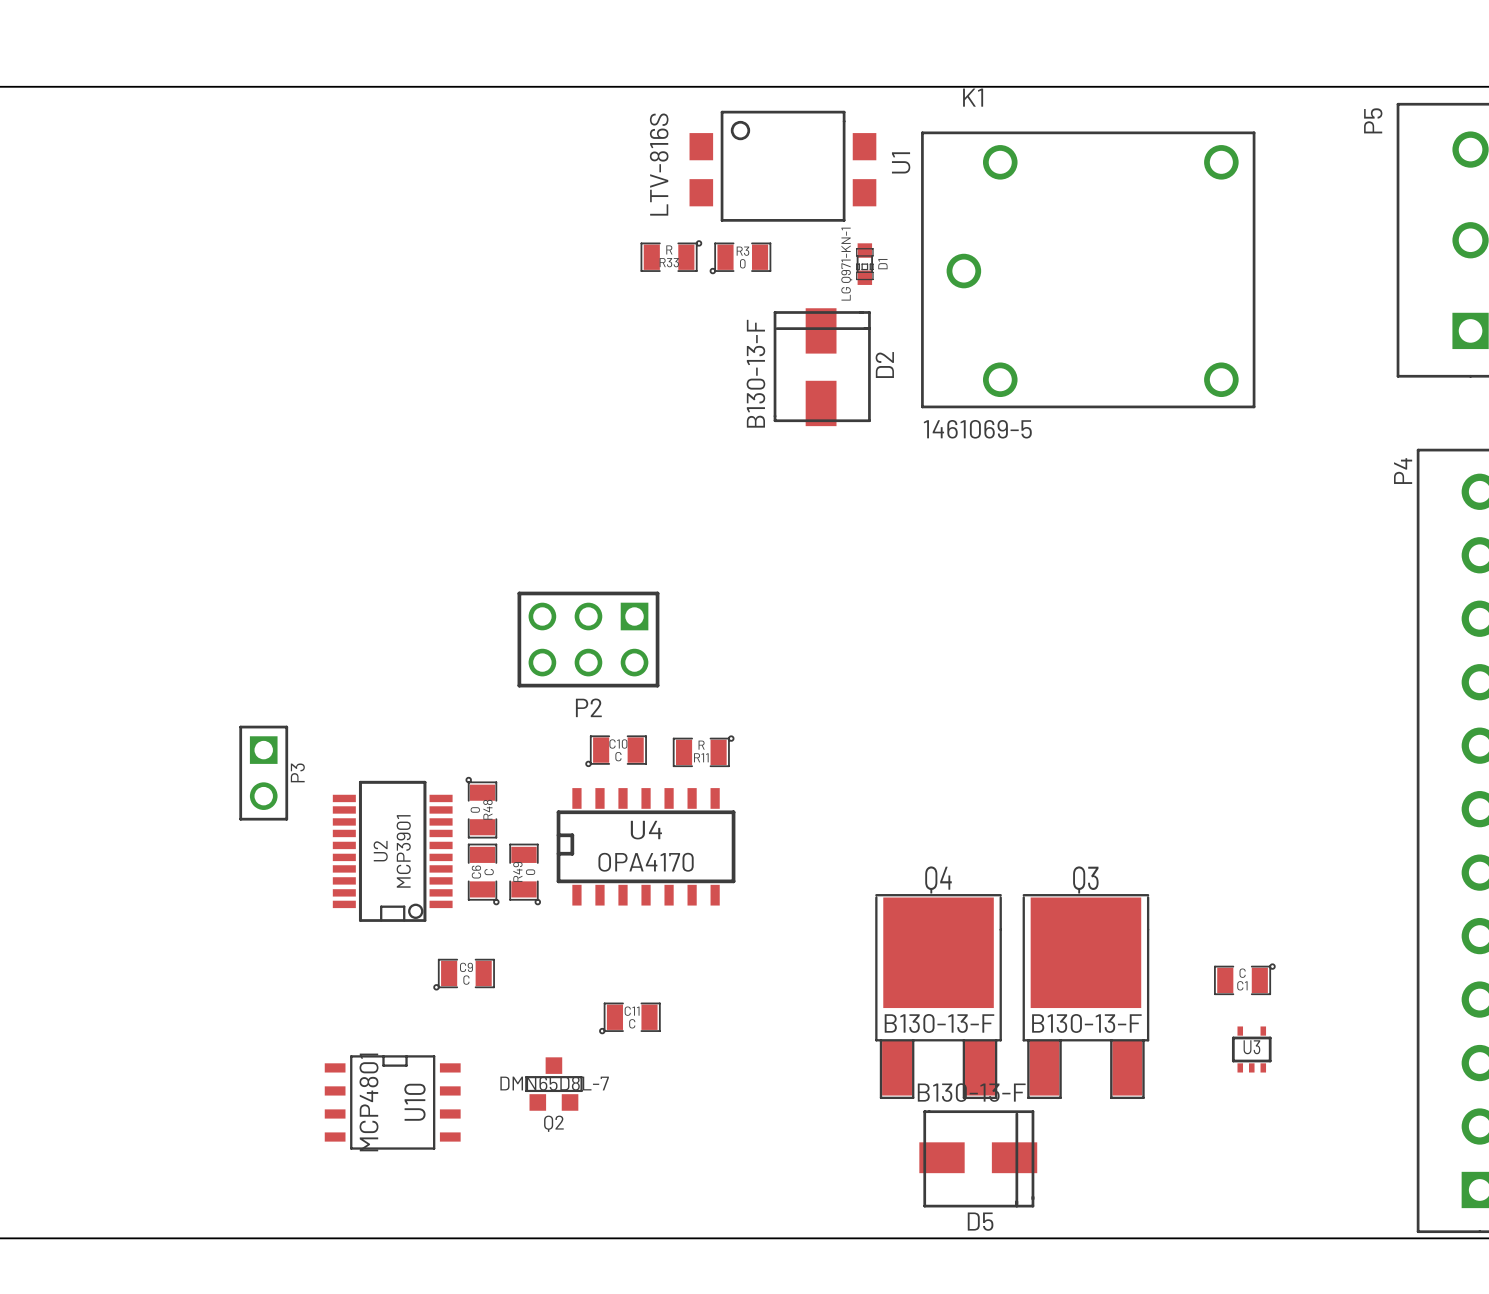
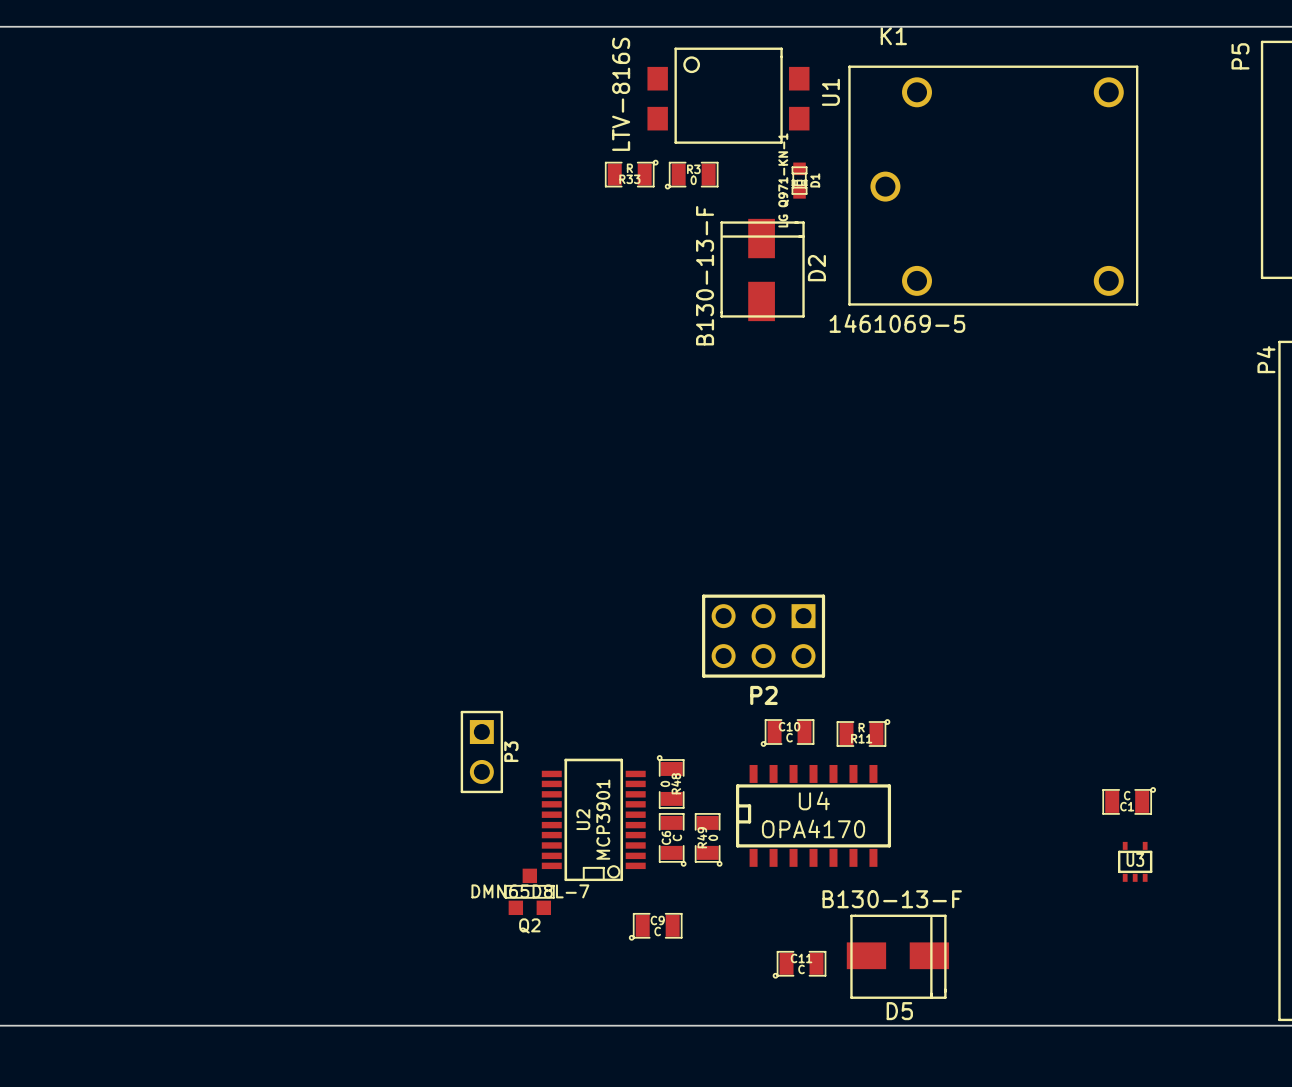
P2 position: (588, 639) -> (763, 636)
C10 position: (616, 751) -> (787, 733)
R11 position: (703, 751) -> (863, 733)
P3 position: (263, 773) -> (481, 751)
R48 position: (481, 807) -> (670, 781)
U4 position: (646, 846) -> (813, 815)
U2 position: (392, 851) -> (593, 819)
C6 position: (483, 874) -> (672, 839)
R49 position: (525, 874) -> (708, 839)
C9 position: (464, 974) -> (655, 926)
Q4: B130-13-F (938, 996) -> none
Q3: B130-13-F (1085, 996) -> none
C11 position: (629, 1018) -> (799, 964)
U10: MCP4801 (392, 1102) -> none

